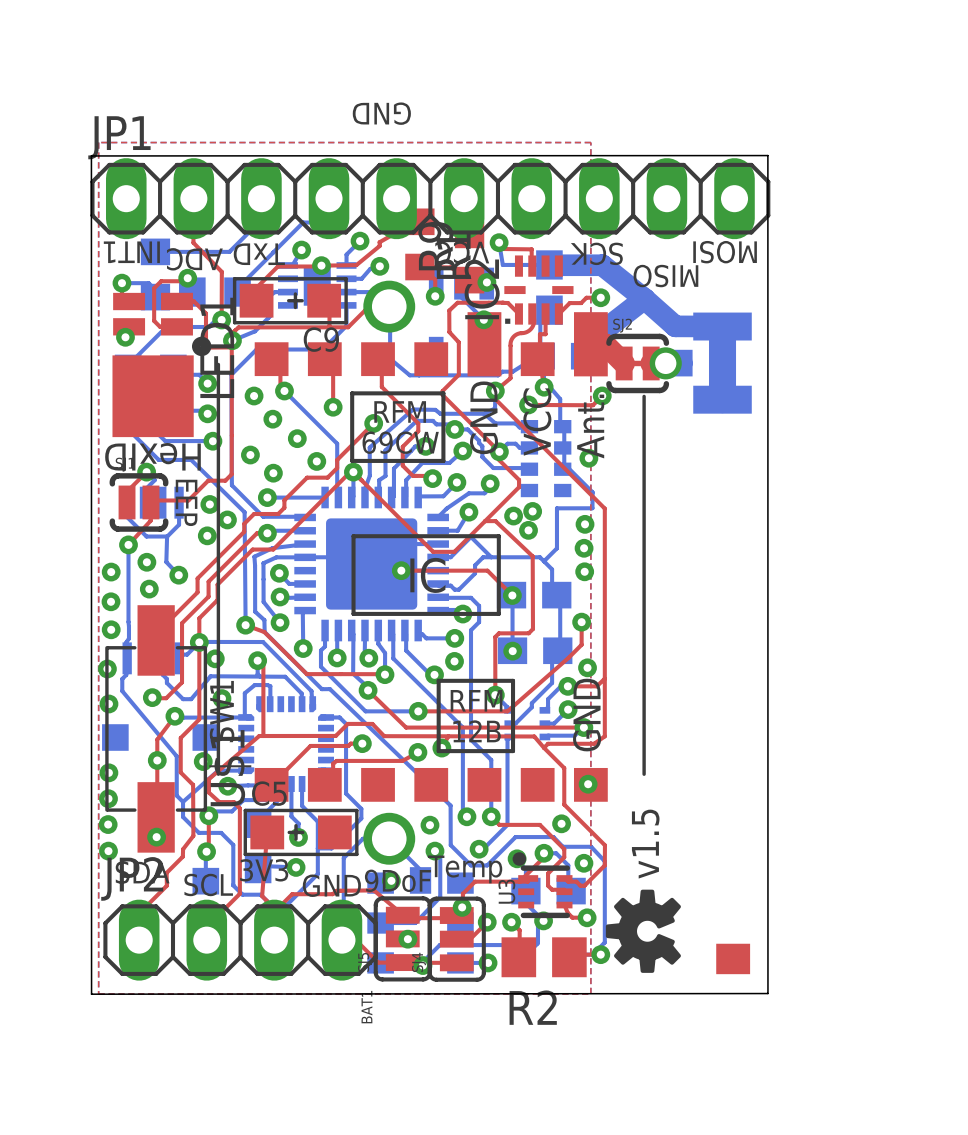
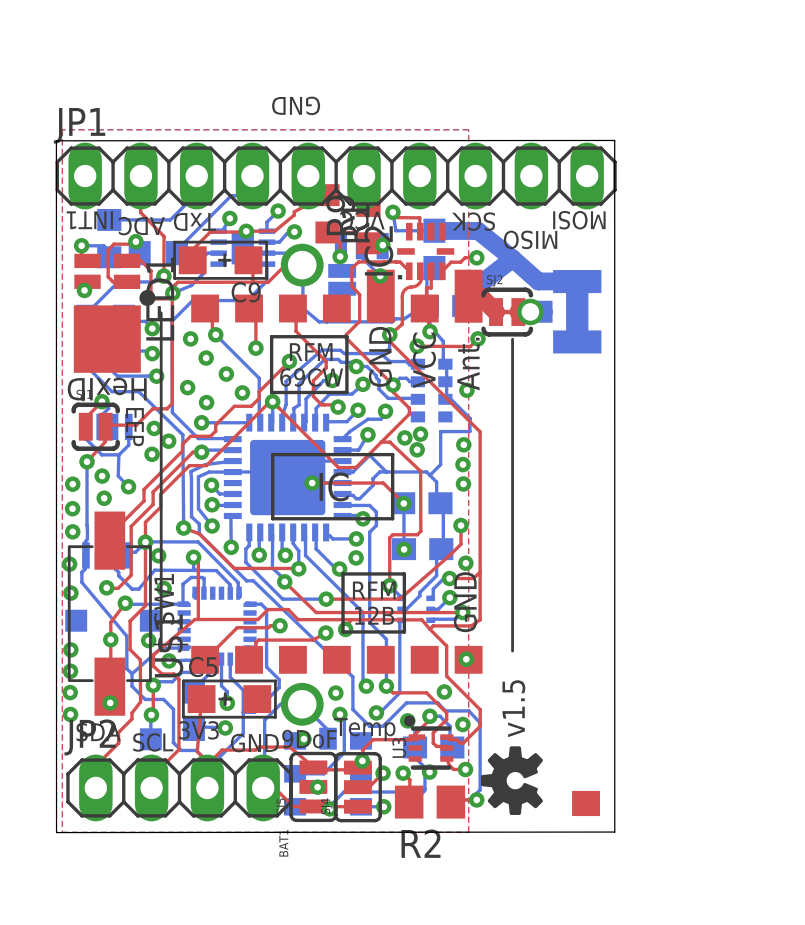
part: none -> (342, 279)

